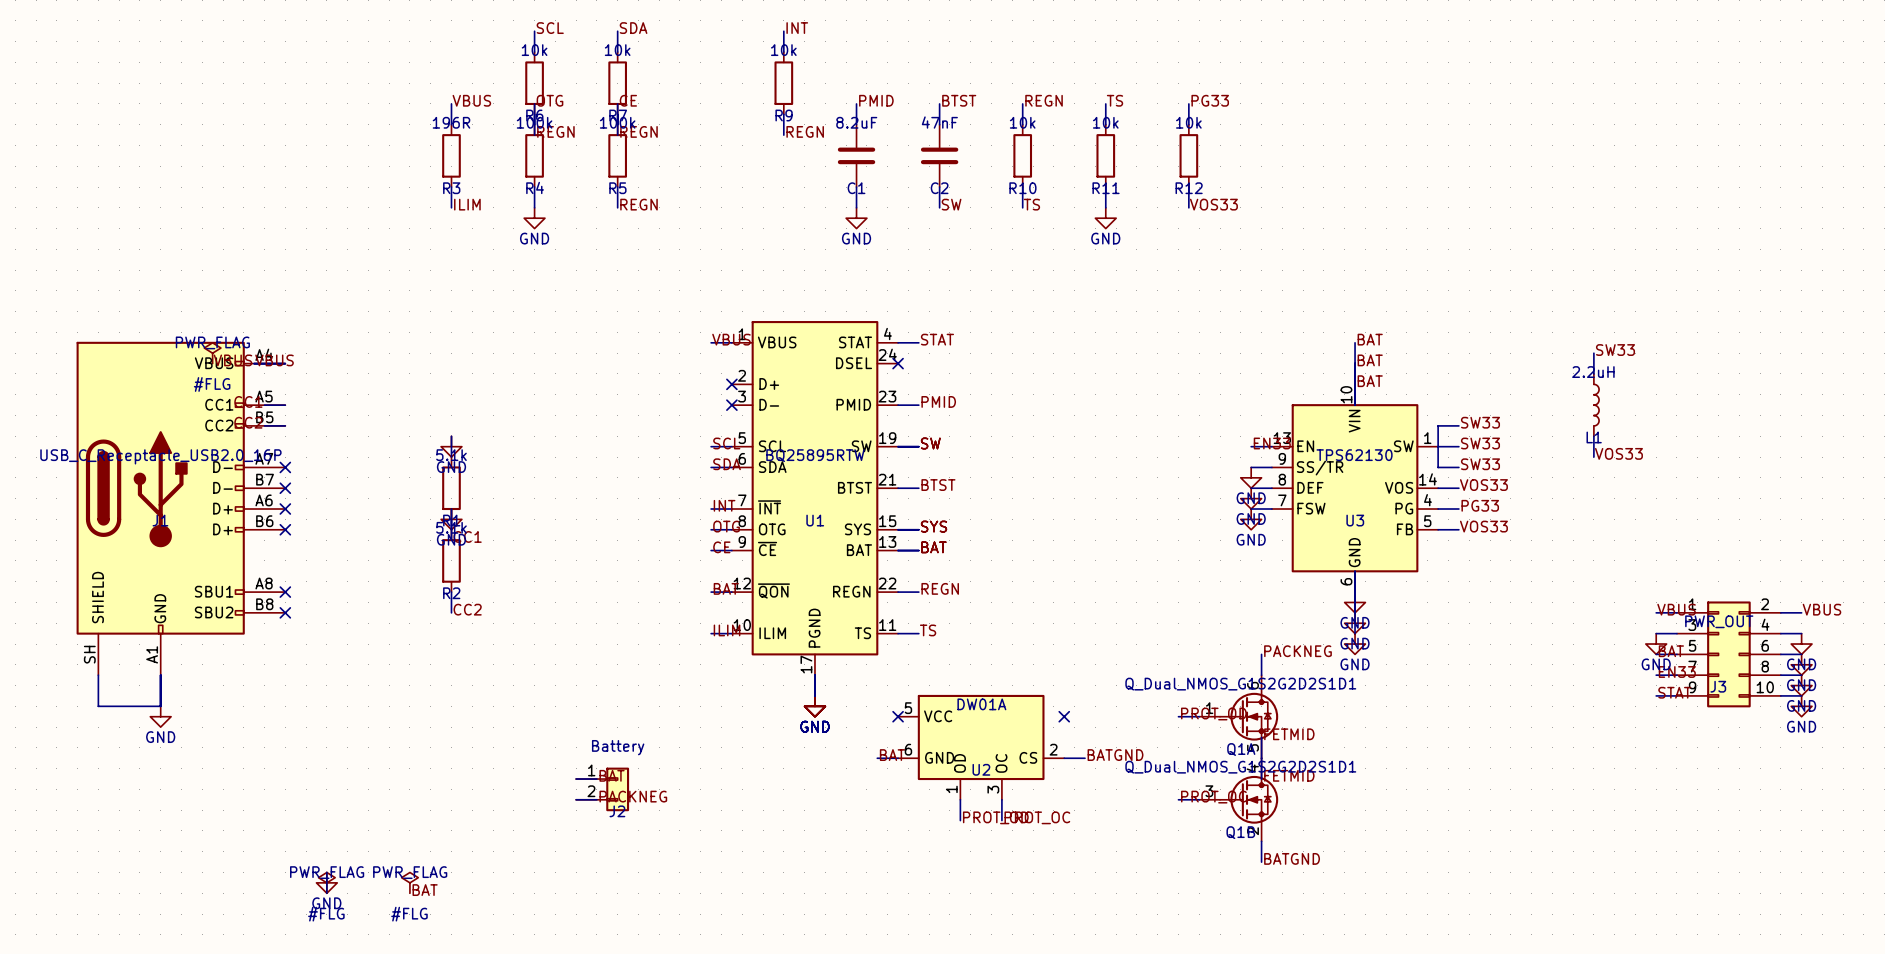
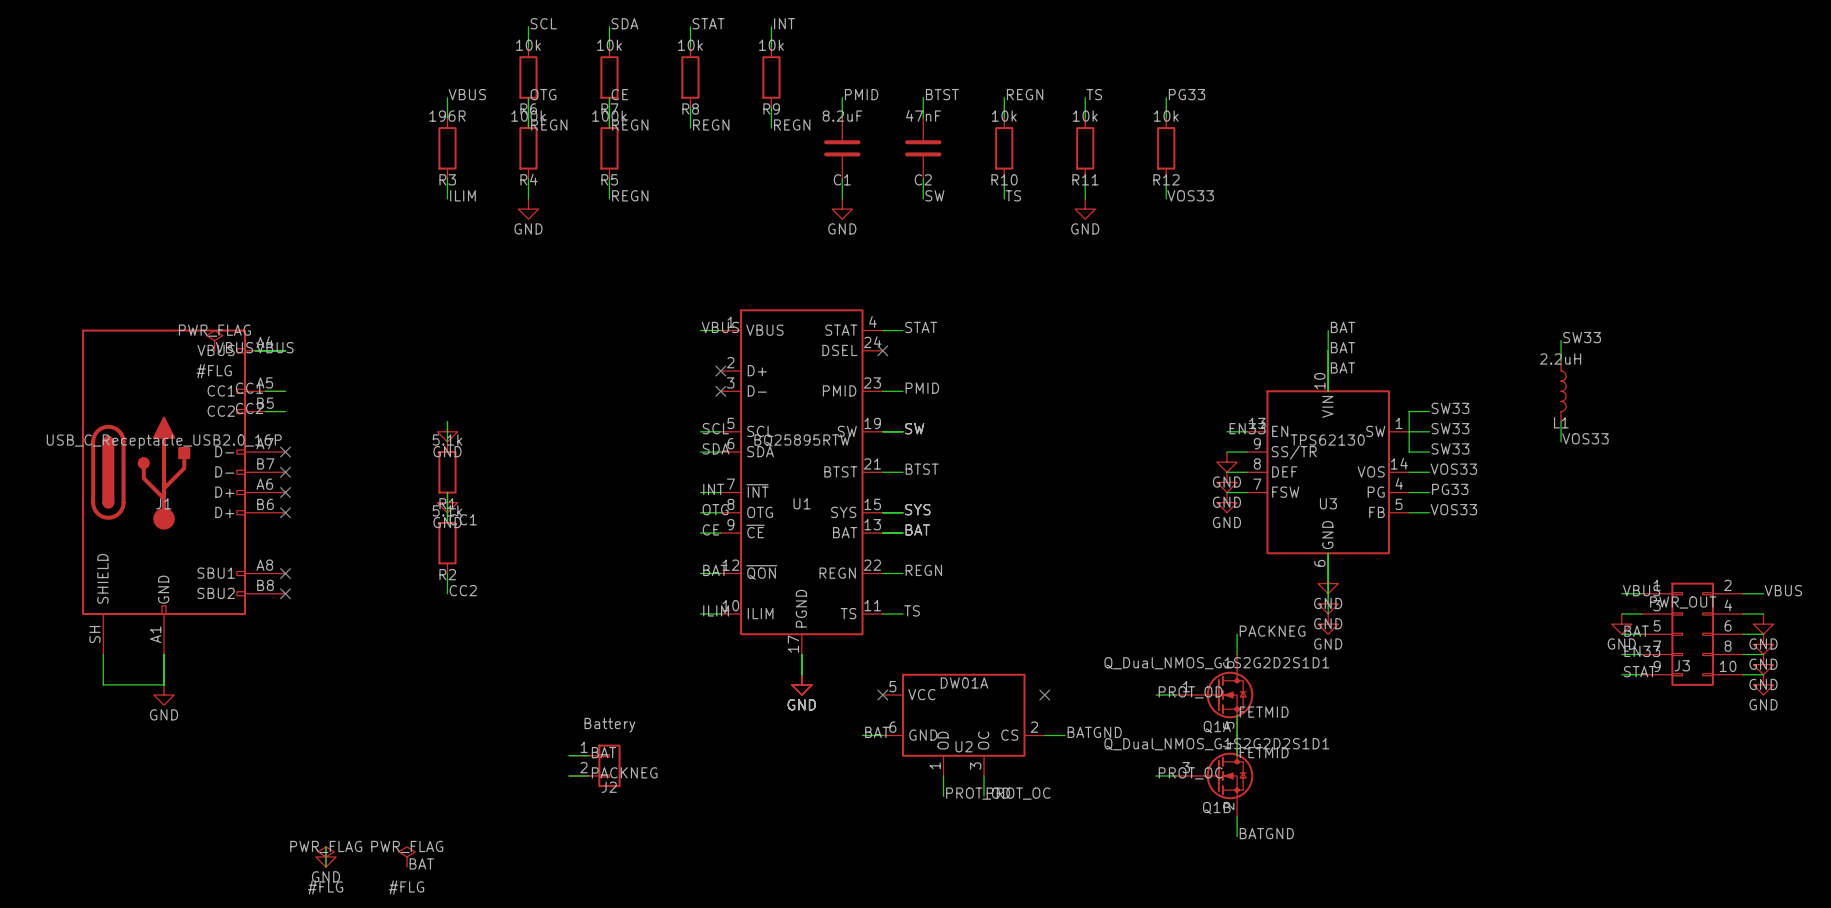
label: none -> STAT (708, 23)
wire: none -> (690, 26) (690, 47)
R8: none -> 10k (690, 77)
wire: none -> (690, 107) (690, 128)
label: none -> REGN (711, 124)

